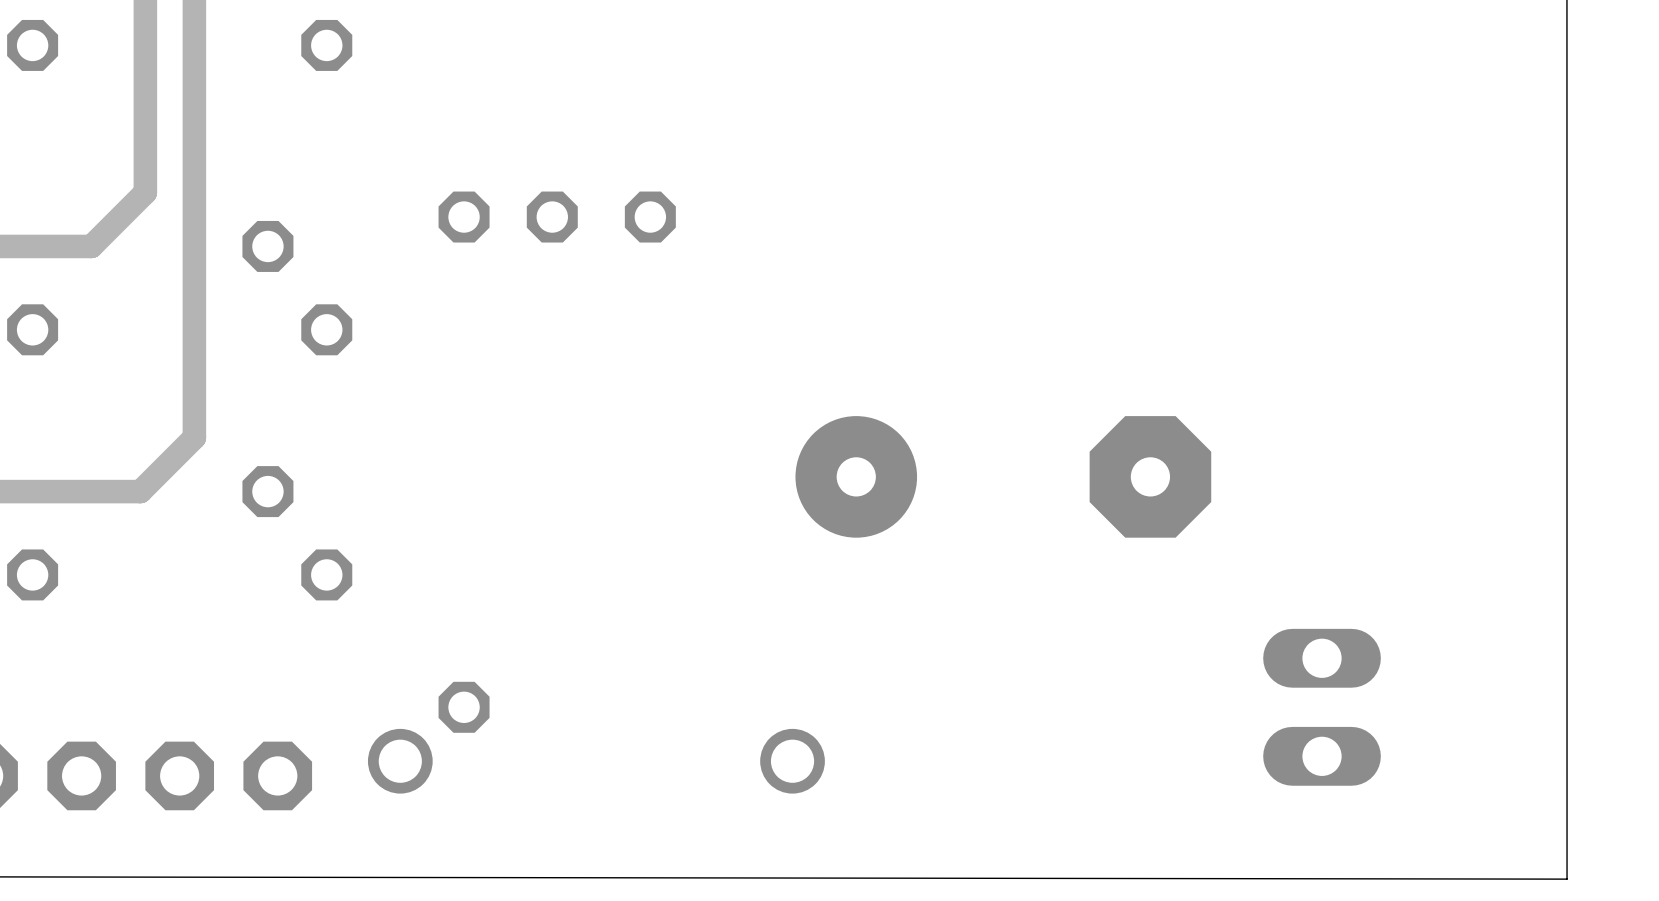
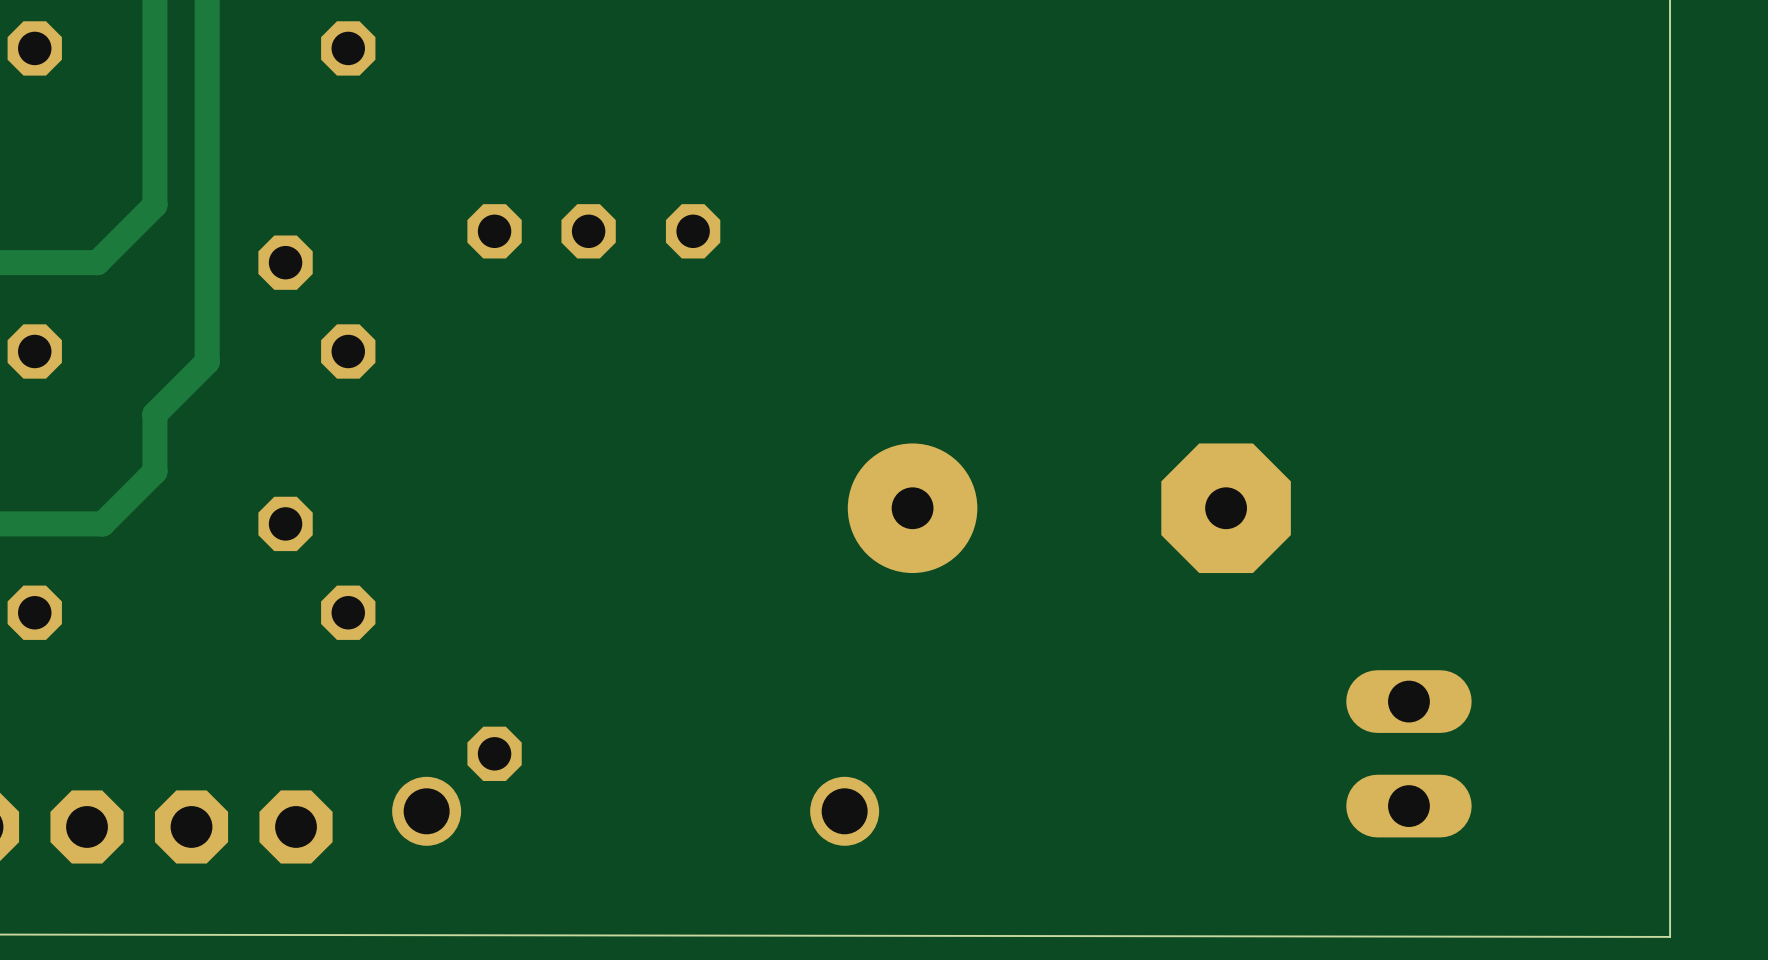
track: (194, 339) (194, 437) (140, 491) (96, 491) -> (207, 361) (154, 414) (154, 471) (102, 523)

